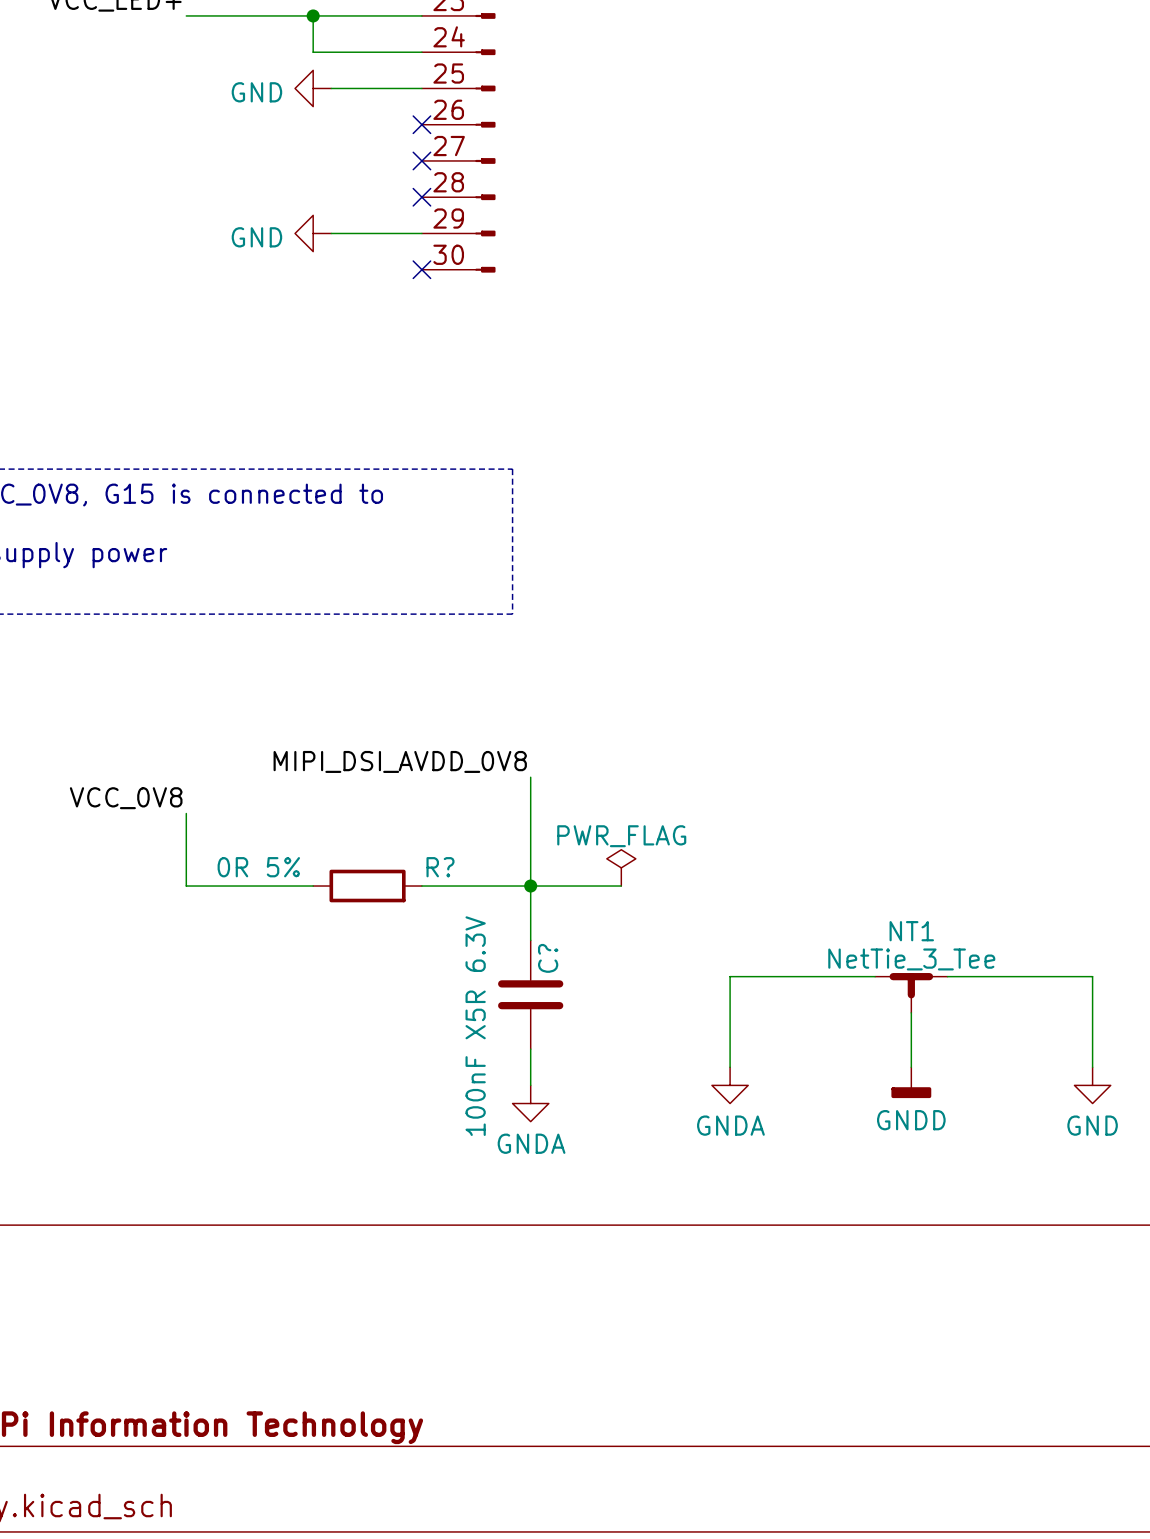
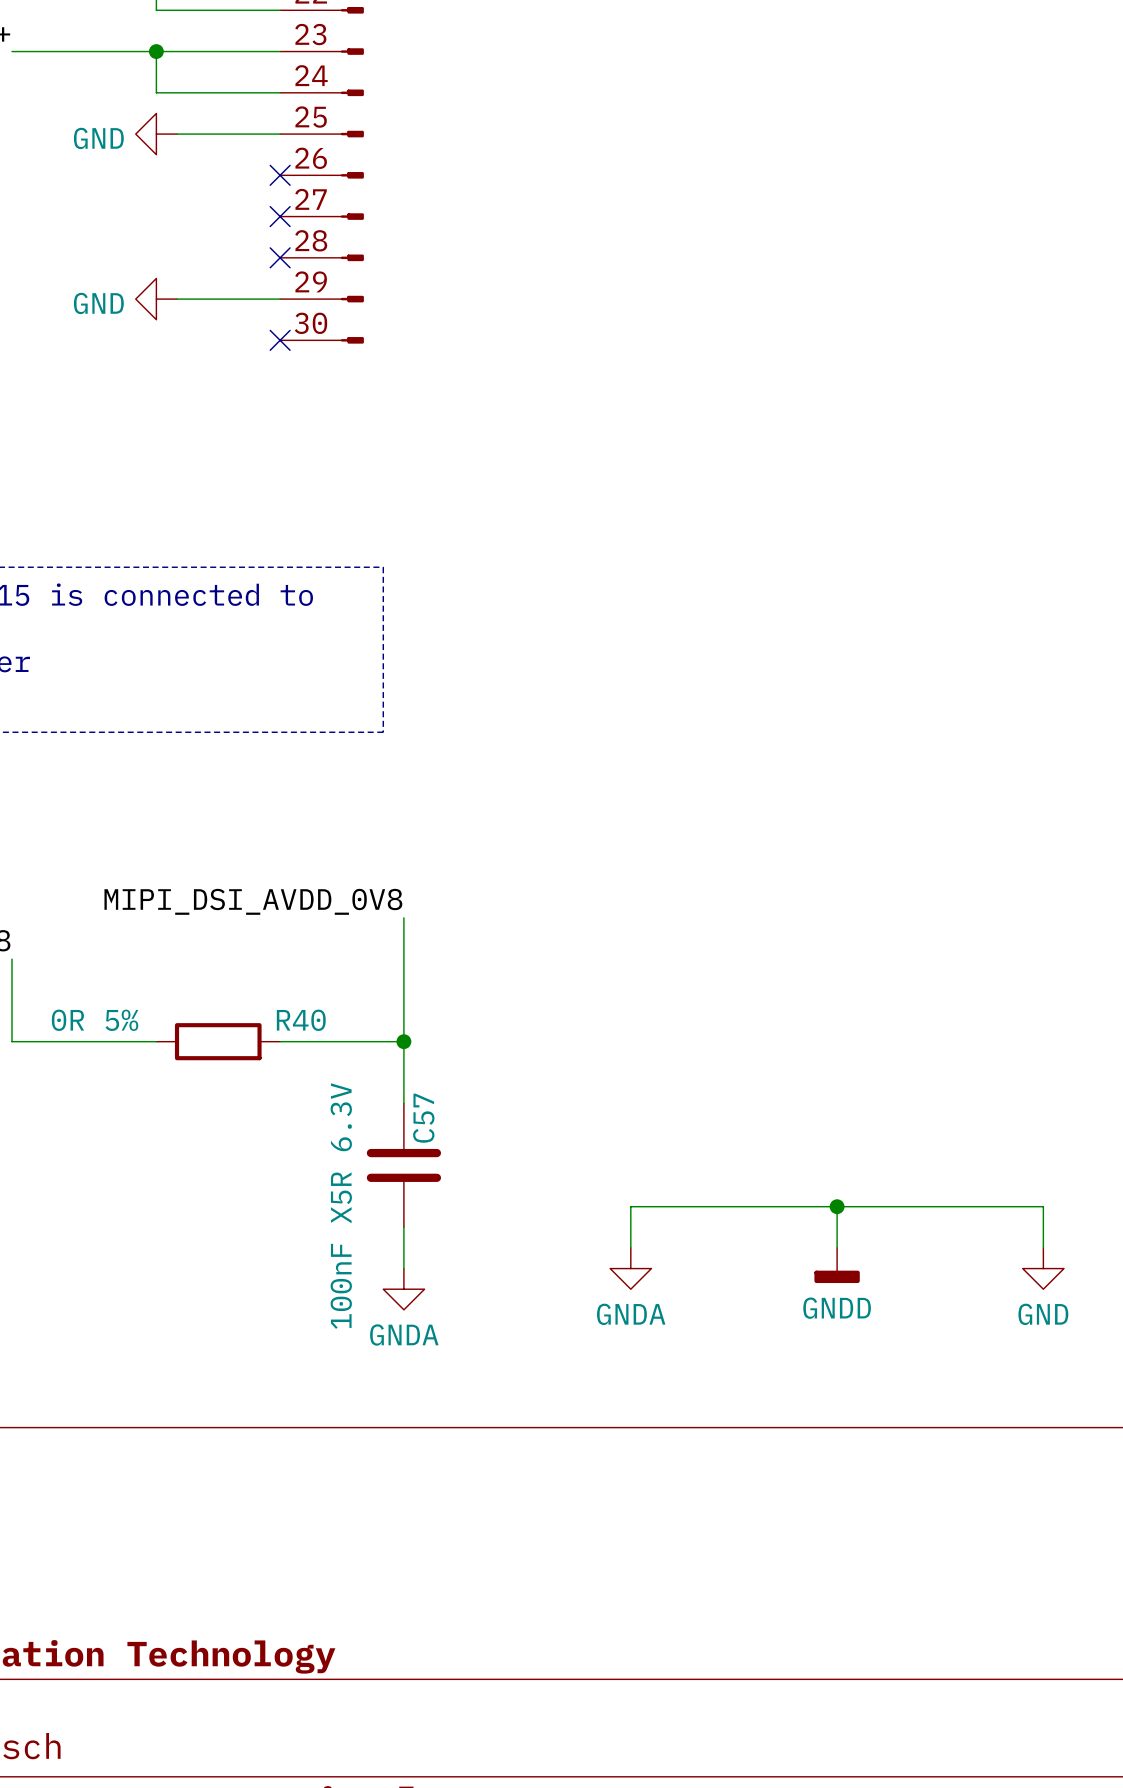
R? name: R? (440, 867) -> R40 (301, 1020)
power symbol: PWR_FLAG (621, 867) -> none
wire: (530, 886) (621, 886) -> none
C? name: C? (548, 958) -> C57 (423, 1118)
wire: (875, 976) (730, 976) (730, 1031) -> none
wire: (947, 976) (1092, 976) (1092, 1031) -> (630, 1206) (1043, 1206)
NT1: NetTie_3_Tee (911, 993) -> none
wire: (911, 1012) (911, 1031) -> none
junction: none -> (837, 1206)

